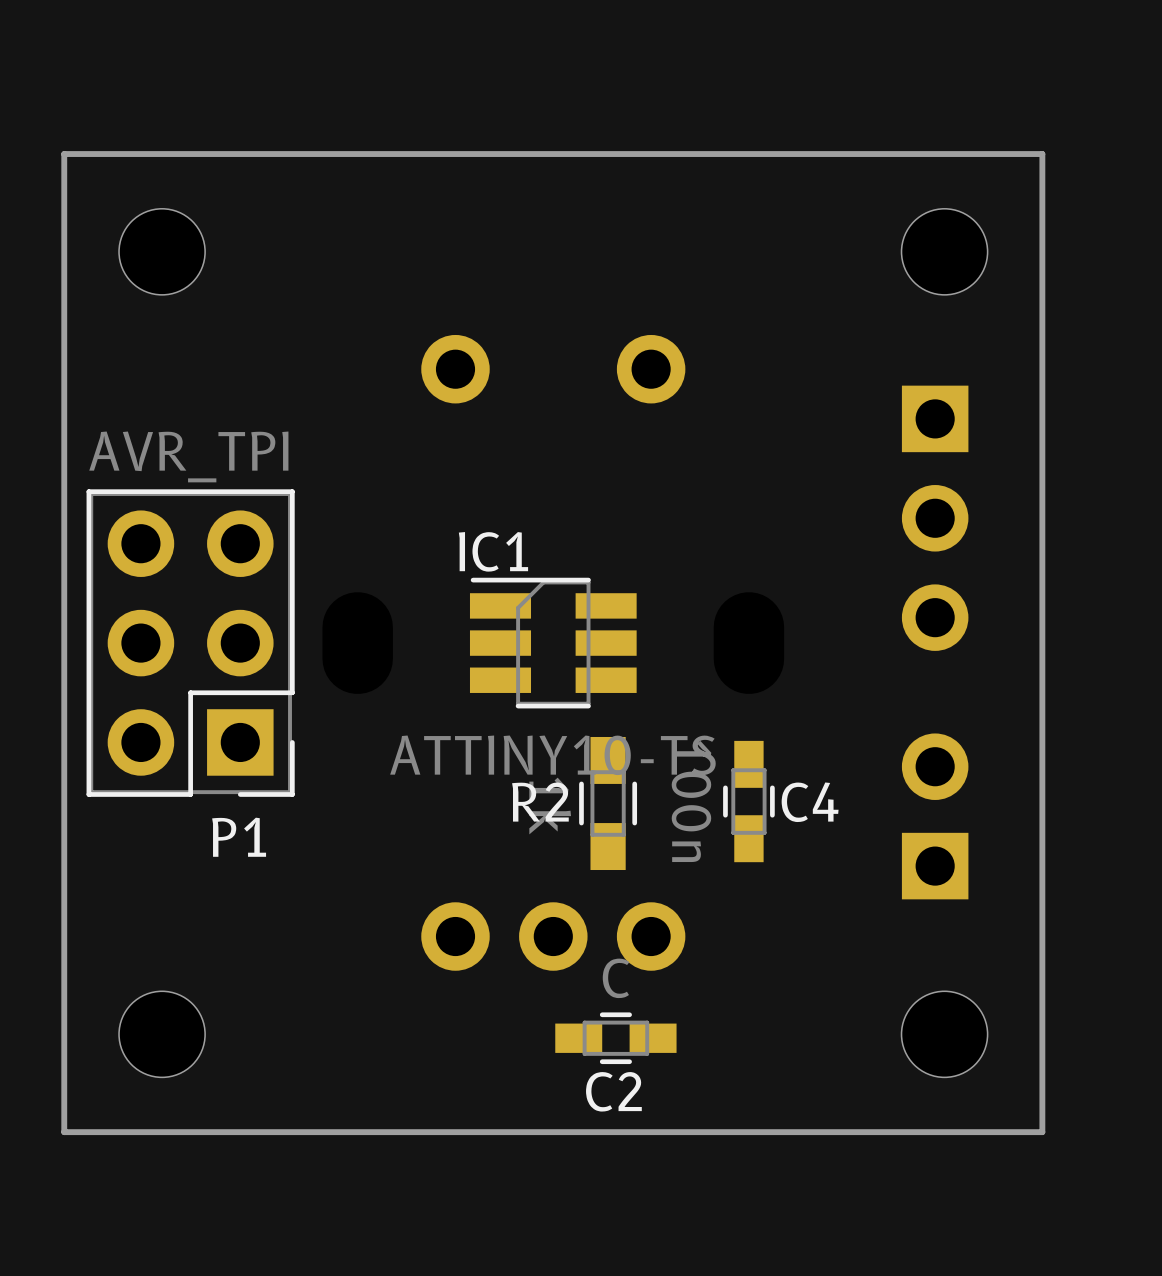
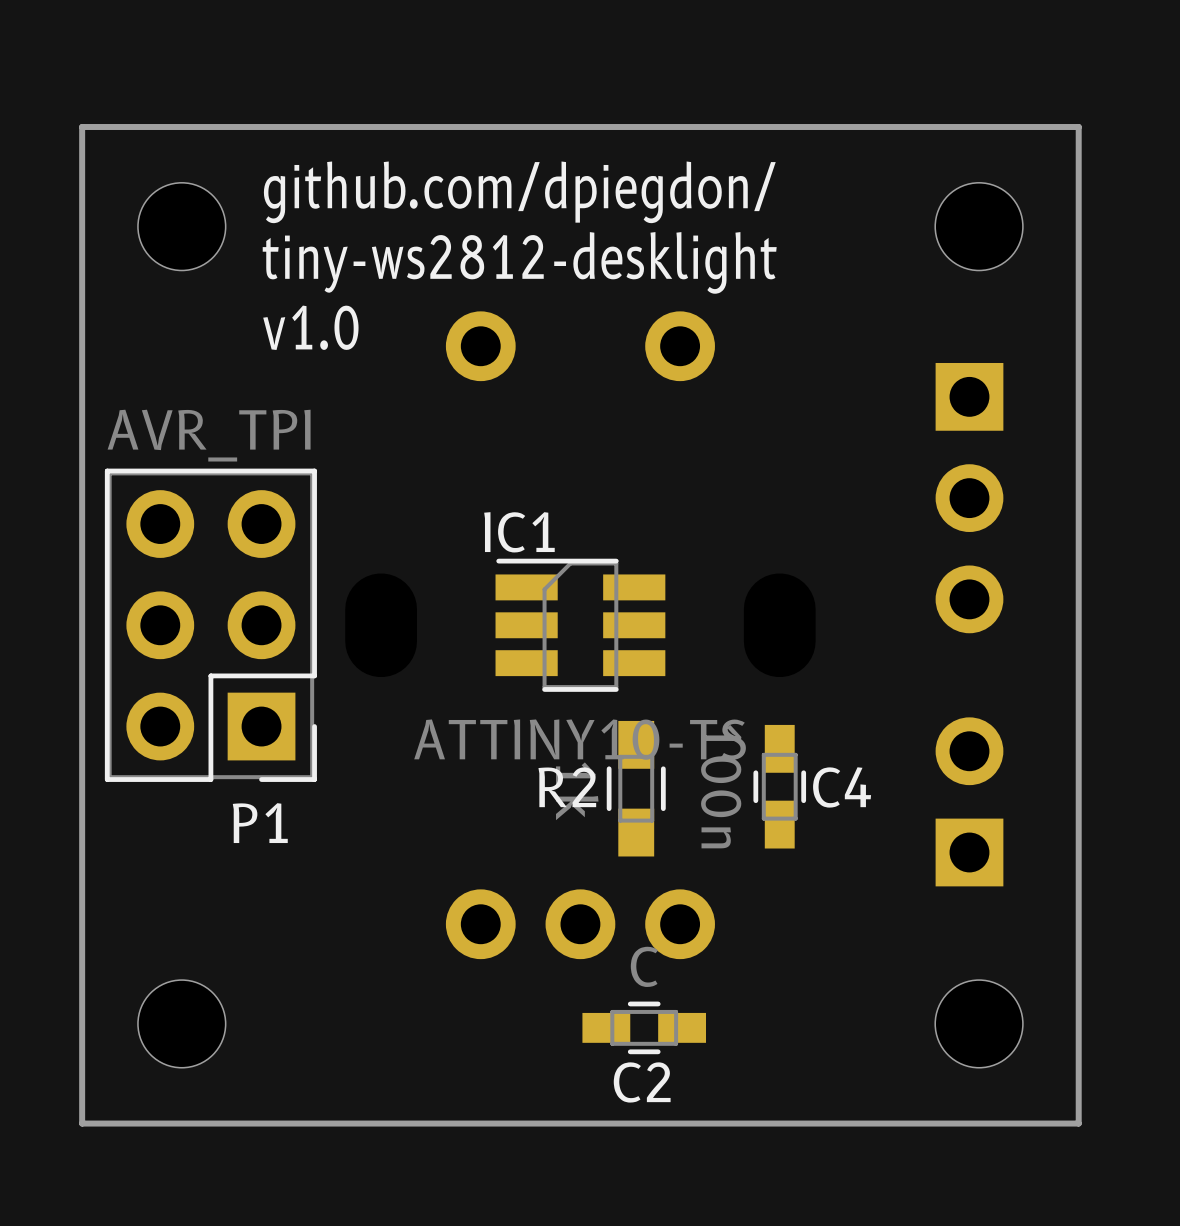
text: none -> github.com/dpiegdon/ (519, 192)
text: none -> tiny-ws2812-desklight (519, 262)
text: none -> v1.0 (310, 327)

